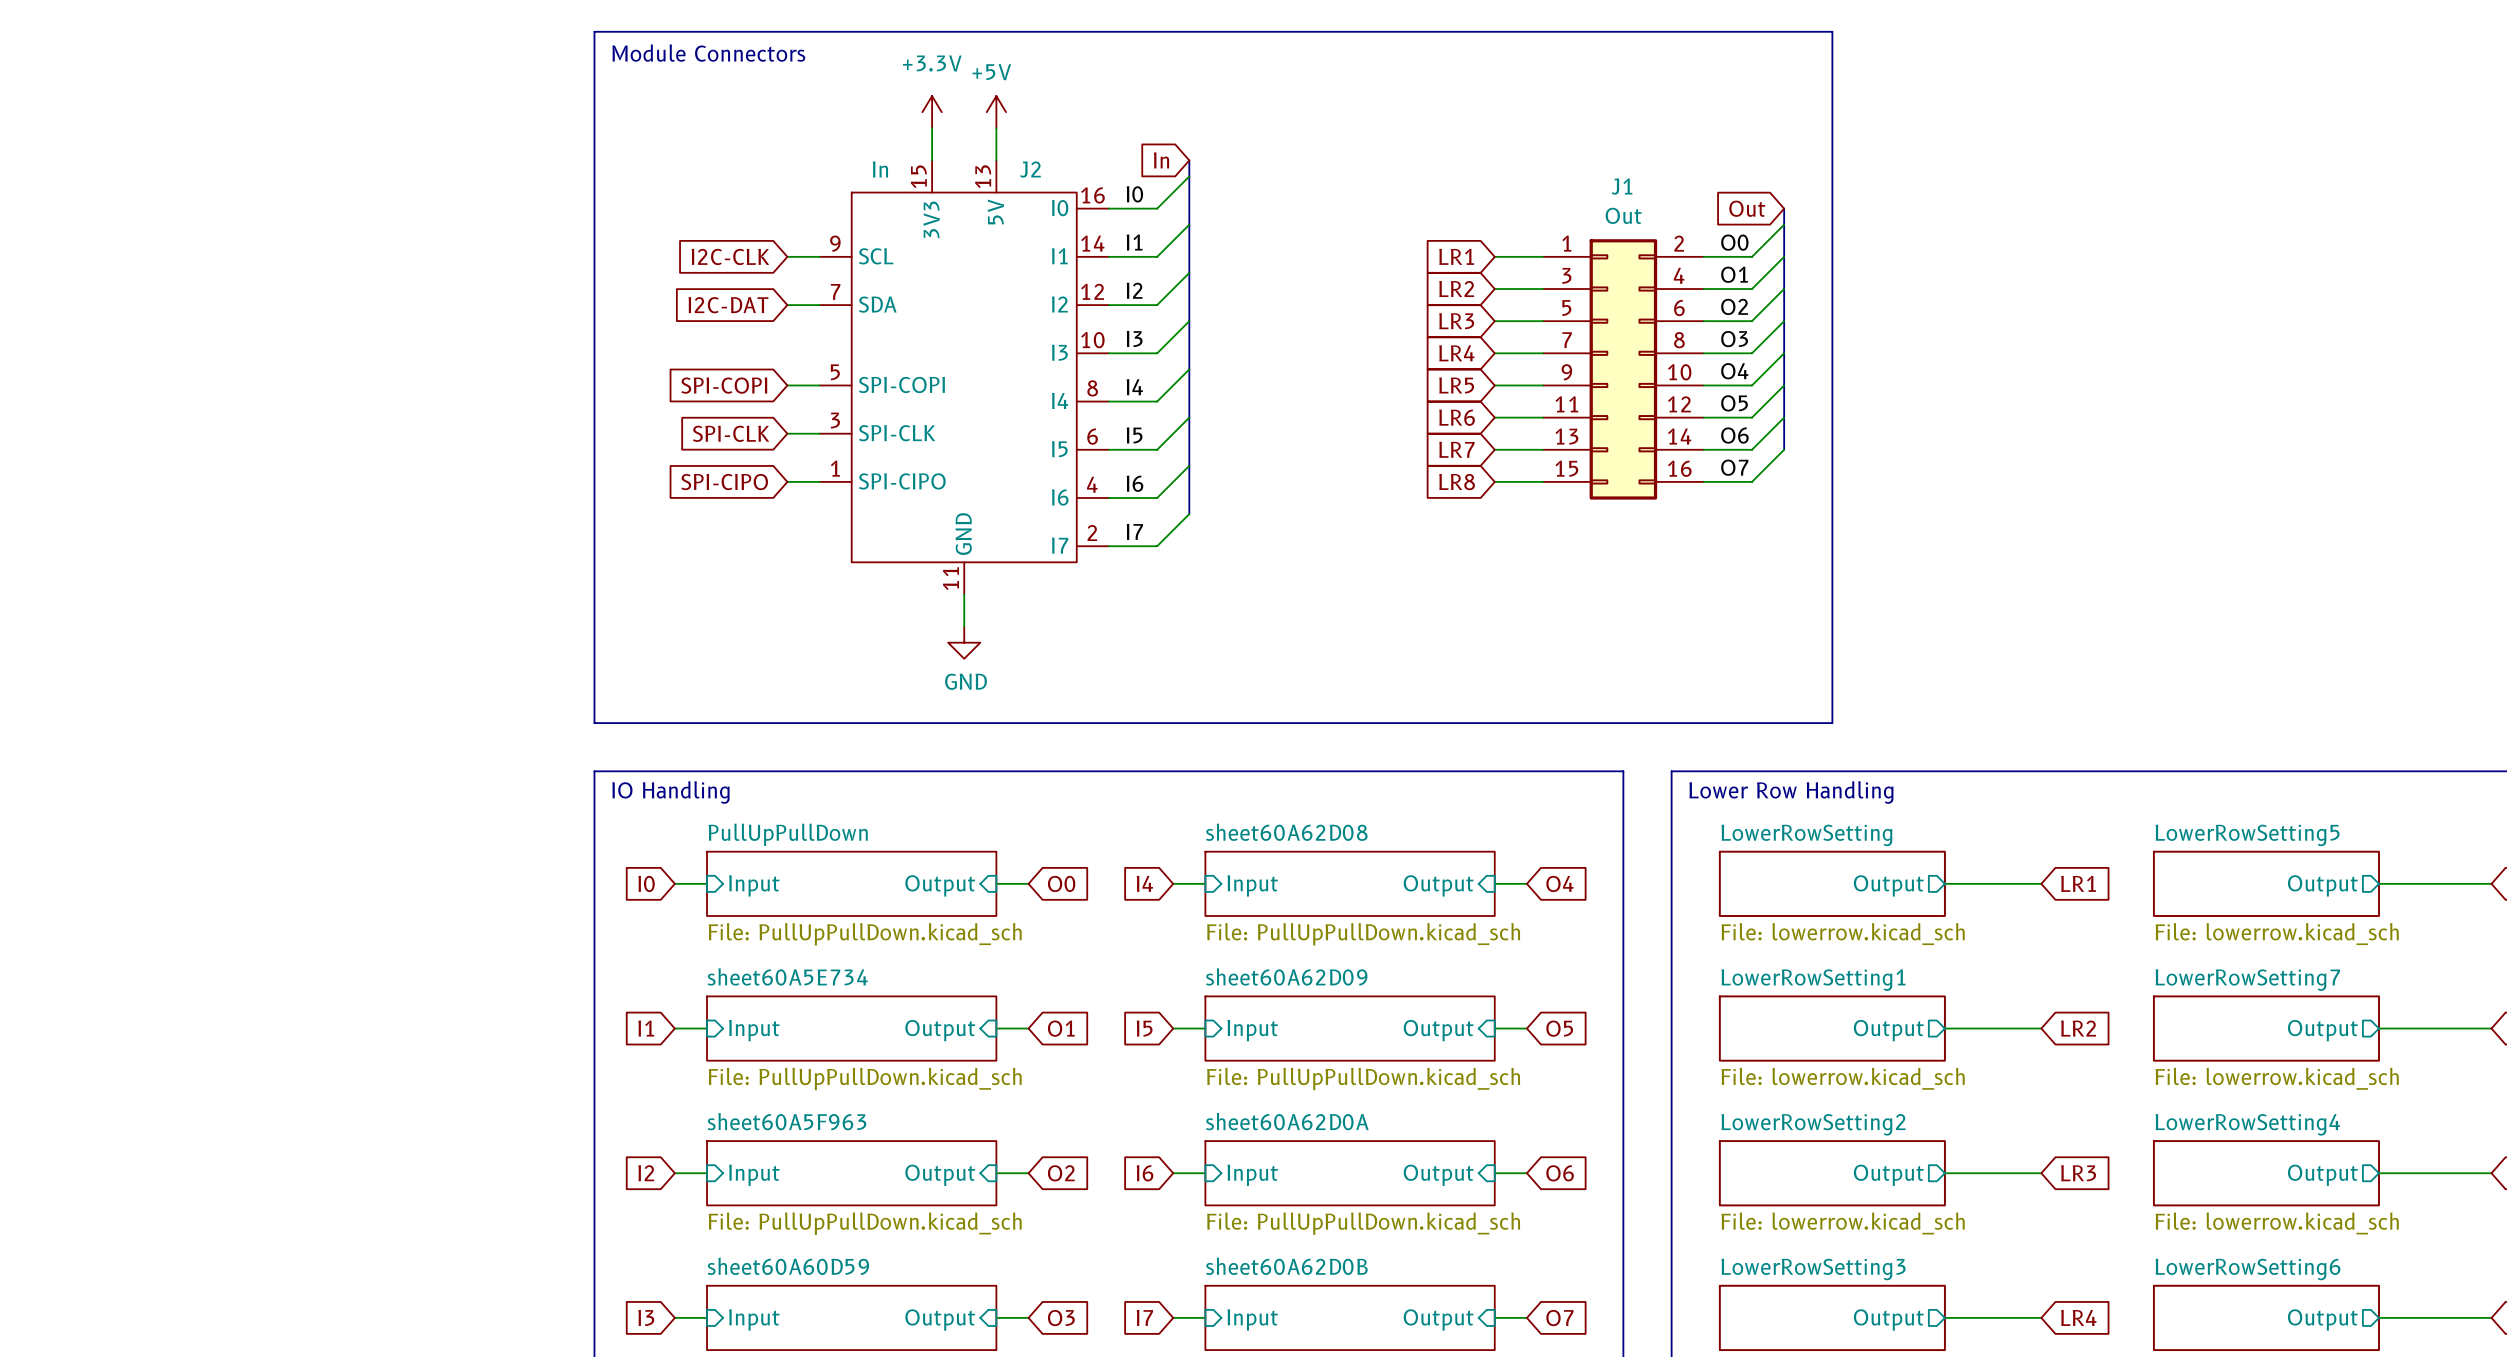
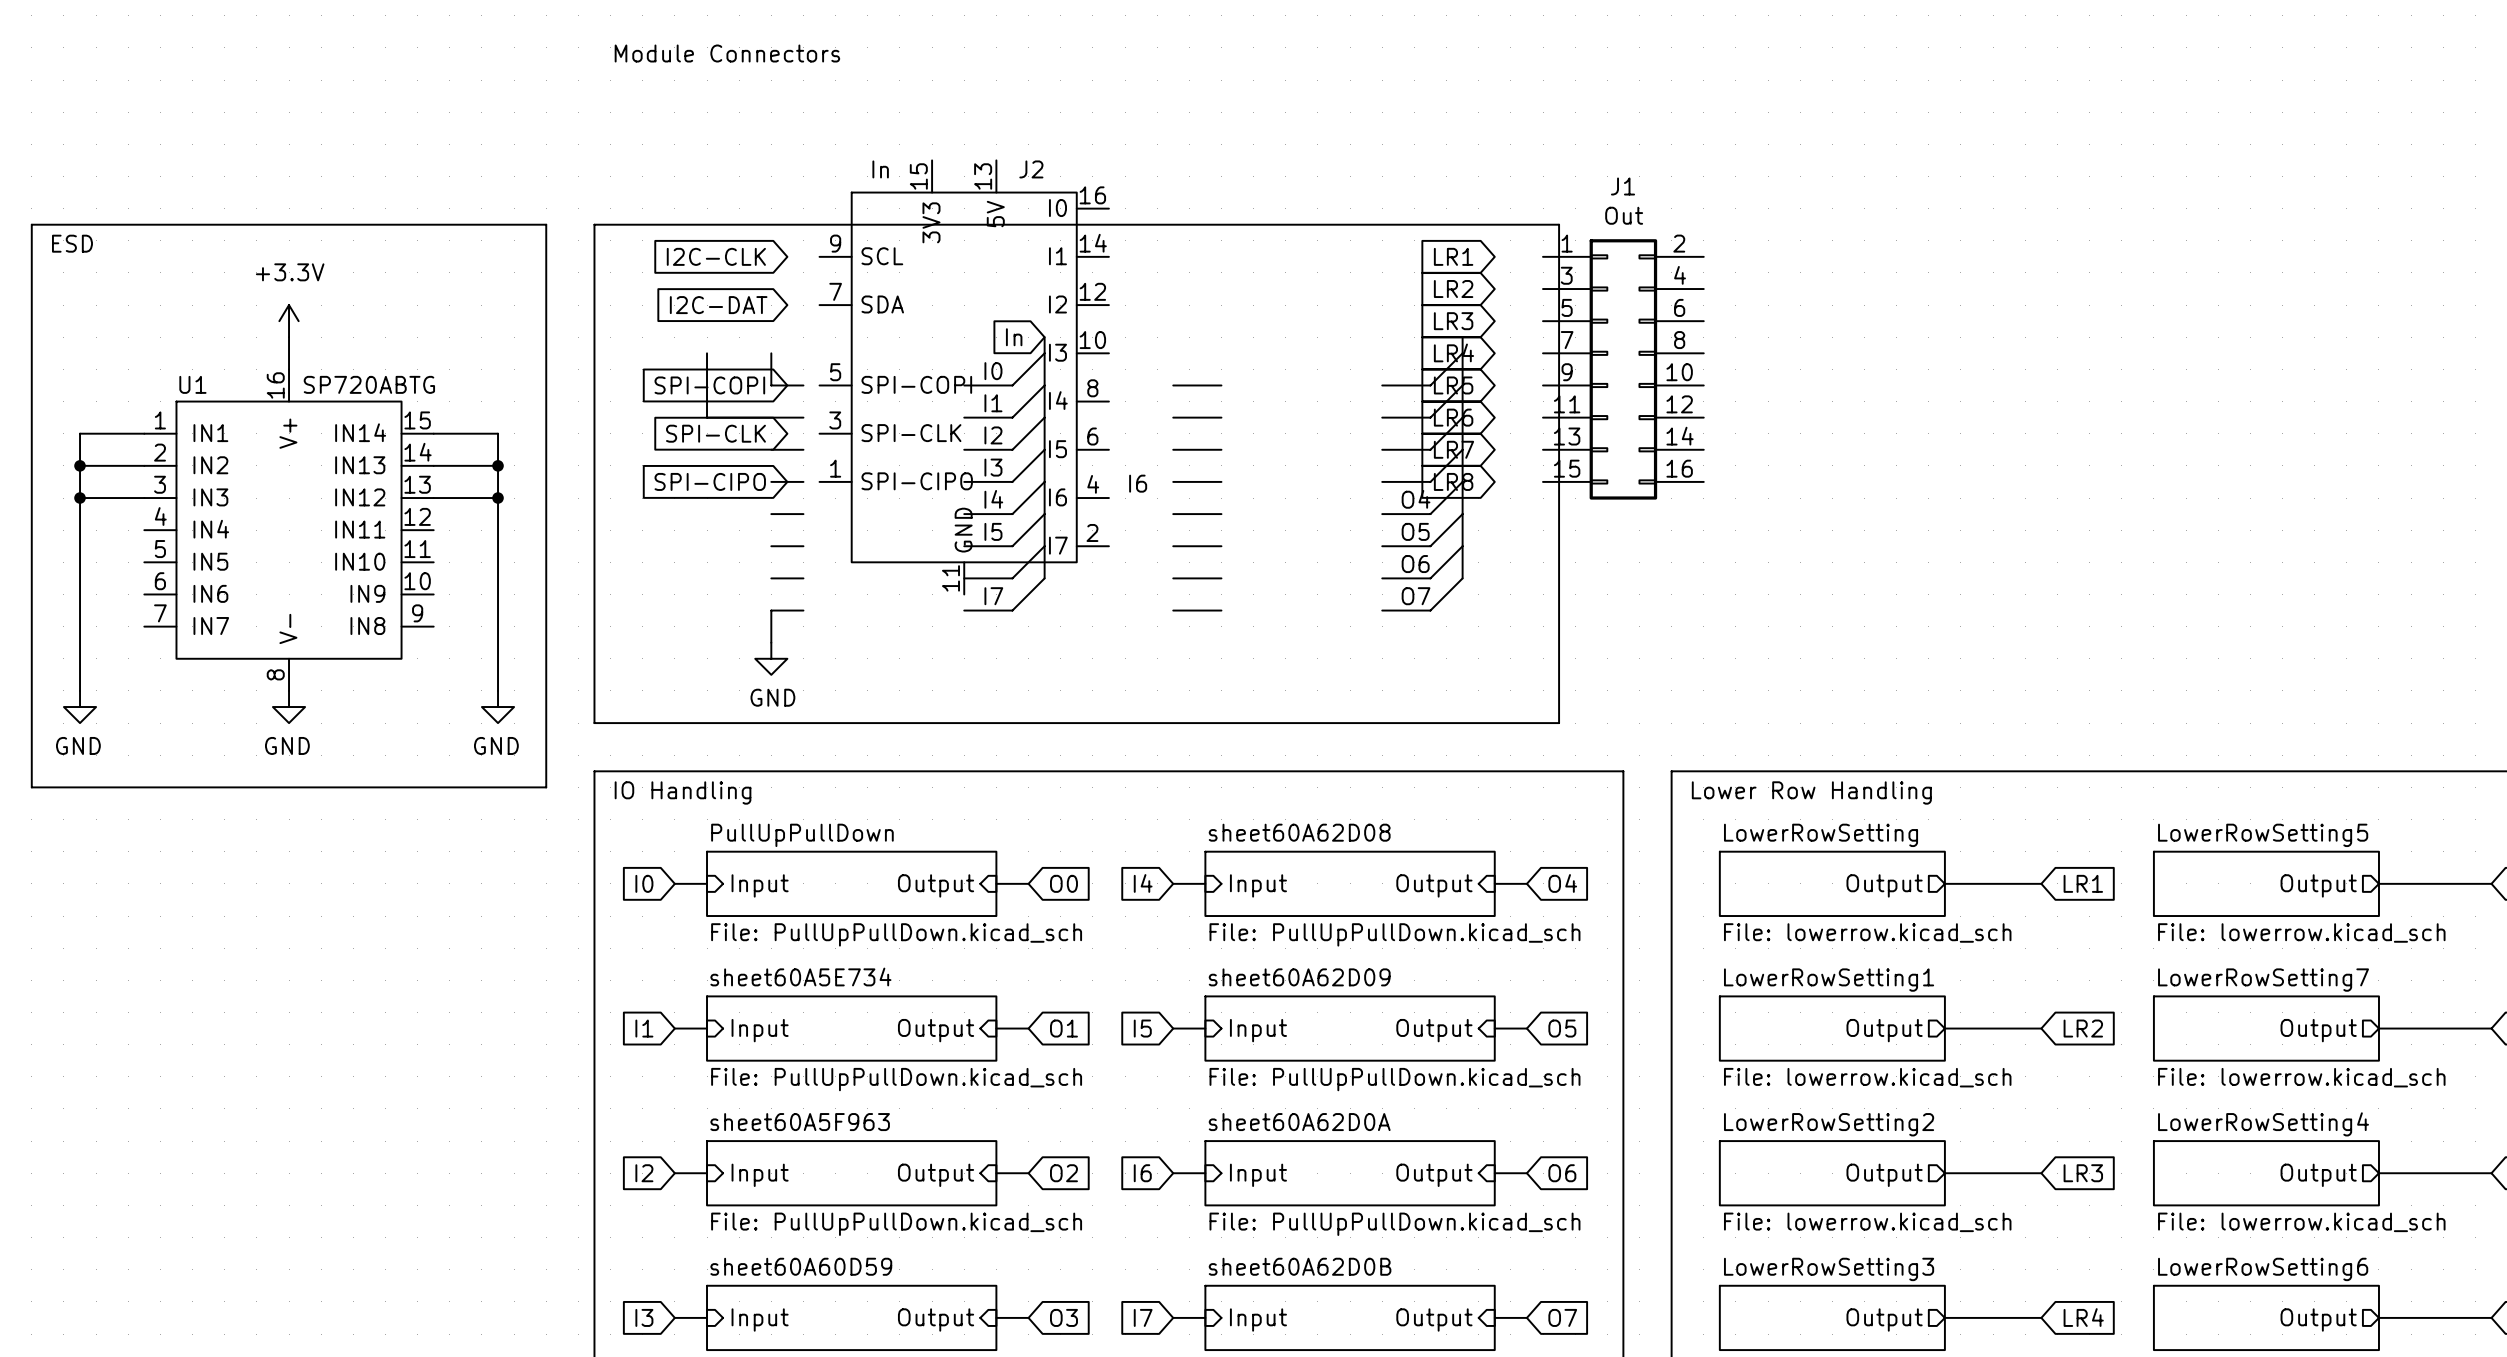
power symbol: +3.3V (932, 112) -> none
power symbol: +5V (996, 112) -> none
wire: (932, 128) (932, 160) -> none
wire: (996, 128) (996, 160) -> none
global label position: In (1161, 160) -> In (1014, 337)
bus: (1189, 160) (1189, 514) -> none
wire: (1189, 176) (1157, 208) (1108, 208) -> (1044, 417) (1012, 449) (964, 449)
label position: I0 (1134, 194) -> I0 (993, 371)
global label: Out (1747, 208) -> none
bus: (1784, 208) (1784, 449) -> none
line: none -> (31, 224) (31, 787) (546, 787) (546, 224) (31, 224)
line: (594, 224) (594, 31) (1832, 31) (1832, 723) (1559, 723) -> (594, 224) (1559, 224) (1559, 723)
wire: (1189, 224) (1157, 256) (1108, 256) -> (1462, 353) (1430, 385) (1382, 385)
wire: (1784, 224) (1752, 256) (1703, 256) -> none
label position: I1 (1134, 242) -> I1 (993, 403)
label: O0 (1734, 242) -> none
text: none -> ESD (72, 243)
wire: (787, 256) (819, 256) -> (771, 514) (803, 514)
wire: (1494, 256) (1543, 256) -> none
wire: (1784, 256) (1752, 289) (1703, 289) -> none
wire: (1189, 272) (1157, 305) (1108, 305) -> (1044, 385) (1012, 417) (964, 417)
label: O1 (1734, 274) -> none
wire: (1494, 289) (1543, 289) -> none
wire: (1784, 289) (1752, 321) (1703, 321) -> none
label position: I2 (1134, 290) -> I2 (993, 435)
wire: (787, 305) (819, 305) -> (771, 449) (803, 449)
label: O2 (1734, 306) -> none
power symbol: none -> +3.3V (289, 321)
wire: (1189, 321) (1157, 353) (1108, 353) -> (1044, 353) (1012, 385) (964, 385)
wire: (1494, 321) (1543, 321) -> none
wire: (1784, 321) (1752, 353) (1703, 353) -> none
wire: none -> (289, 337) (289, 369)
bus: none -> (1044, 337) (1044, 578)
bus: none -> (1462, 337) (1462, 578)
label position: I3 (1134, 338) -> I3 (993, 467)
label: O3 (1734, 339) -> none
wire: none -> (707, 353) (707, 417) (803, 417)
wire: none -> (771, 353) (771, 385) (787, 385)
wire: (1494, 353) (1543, 353) -> none
wire: (1784, 353) (1752, 385) (1703, 385) -> none
wire: (1189, 369) (1157, 401) (1108, 401) -> (1044, 481) (1012, 514) (964, 514)
label: O4 (1734, 371) -> none
wire: (803, 385) (819, 385) -> none
wire: none -> (1173, 385) (1221, 385)
wire: none -> (1462, 385) (1430, 417) (1382, 417)
wire: (1494, 385) (1543, 385) -> none
wire: (1784, 385) (1752, 417) (1703, 417) -> none
label position: I4 (1134, 387) -> I4 (993, 499)
label: O5 (1734, 403) -> none
wire: none -> (1173, 417) (1221, 417)
wire: (1189, 417) (1157, 449) (1108, 449) -> (1044, 449) (1012, 481) (964, 481)
wire: none -> (1462, 417) (1430, 449) (1382, 449)
wire: (1494, 417) (1543, 417) -> none
wire: (1784, 417) (1752, 449) (1703, 449) -> none
wire: none -> (144, 433) (80, 433) (80, 690)
wire: none -> (433, 433) (498, 433) (498, 690)
wire: (787, 433) (819, 433) -> (771, 578) (803, 578)
label position: I5 (1134, 435) -> I5 (993, 531)
label: O6 (1734, 435) -> none
wire: none -> (1173, 449) (1221, 449)
wire: none -> (1462, 449) (1430, 481) (1382, 481)
wire: (1494, 449) (1543, 449) -> none
wire: (1784, 449) (1752, 481) (1703, 481) -> none
wire: none -> (80, 465) (144, 465)
junction: none -> (80, 465)
wire: none -> (433, 465) (498, 465)
junction: none -> (498, 465)
wire: (1189, 465) (1157, 498) (1108, 498) -> (1044, 578) (1012, 610) (964, 610)
label: O7 (1734, 467) -> none
wire: (803, 481) (819, 481) -> (771, 481) (787, 481)
wire: none -> (1173, 481) (1221, 481)
wire: none -> (1462, 481) (1430, 514) (1382, 514)
wire: (1494, 481) (1543, 481) -> none
wire: none -> (80, 498) (144, 498)
junction: none -> (80, 498)
wire: none -> (433, 498) (498, 498)
junction: none -> (498, 498)
label: none -> O4 (1416, 499)
wire: none -> (1044, 514) (1012, 546) (964, 546)
wire: none -> (1173, 514) (1221, 514)
wire: (1189, 514) (1157, 546) (1108, 546) -> (1044, 546) (1012, 578) (964, 578)
wire: none -> (1462, 514) (1430, 546) (1382, 546)
U1: none -> SP720ABTG (289, 530)
label position: I7 (1134, 531) -> I7 (993, 596)
label: none -> O5 (1415, 531)
wire: none -> (771, 546) (803, 546)
wire: none -> (1173, 546) (1221, 546)
wire: none -> (1462, 546) (1430, 578) (1382, 578)
label: none -> O6 (1415, 564)
wire: none -> (1173, 578) (1221, 578)
wire: none -> (1462, 578) (1430, 610) (1382, 610)
wire: (964, 594) (964, 626) -> none
label: none -> O7 (1416, 596)
wire: none -> (803, 610) (771, 610) (771, 642)
wire: none -> (1173, 610) (1221, 610)
power symbol position: GND (964, 642) -> GND (771, 658)
power symbol: none -> GND (80, 707)
power symbol: none -> GND (289, 707)
power symbol: none -> GND (498, 707)

